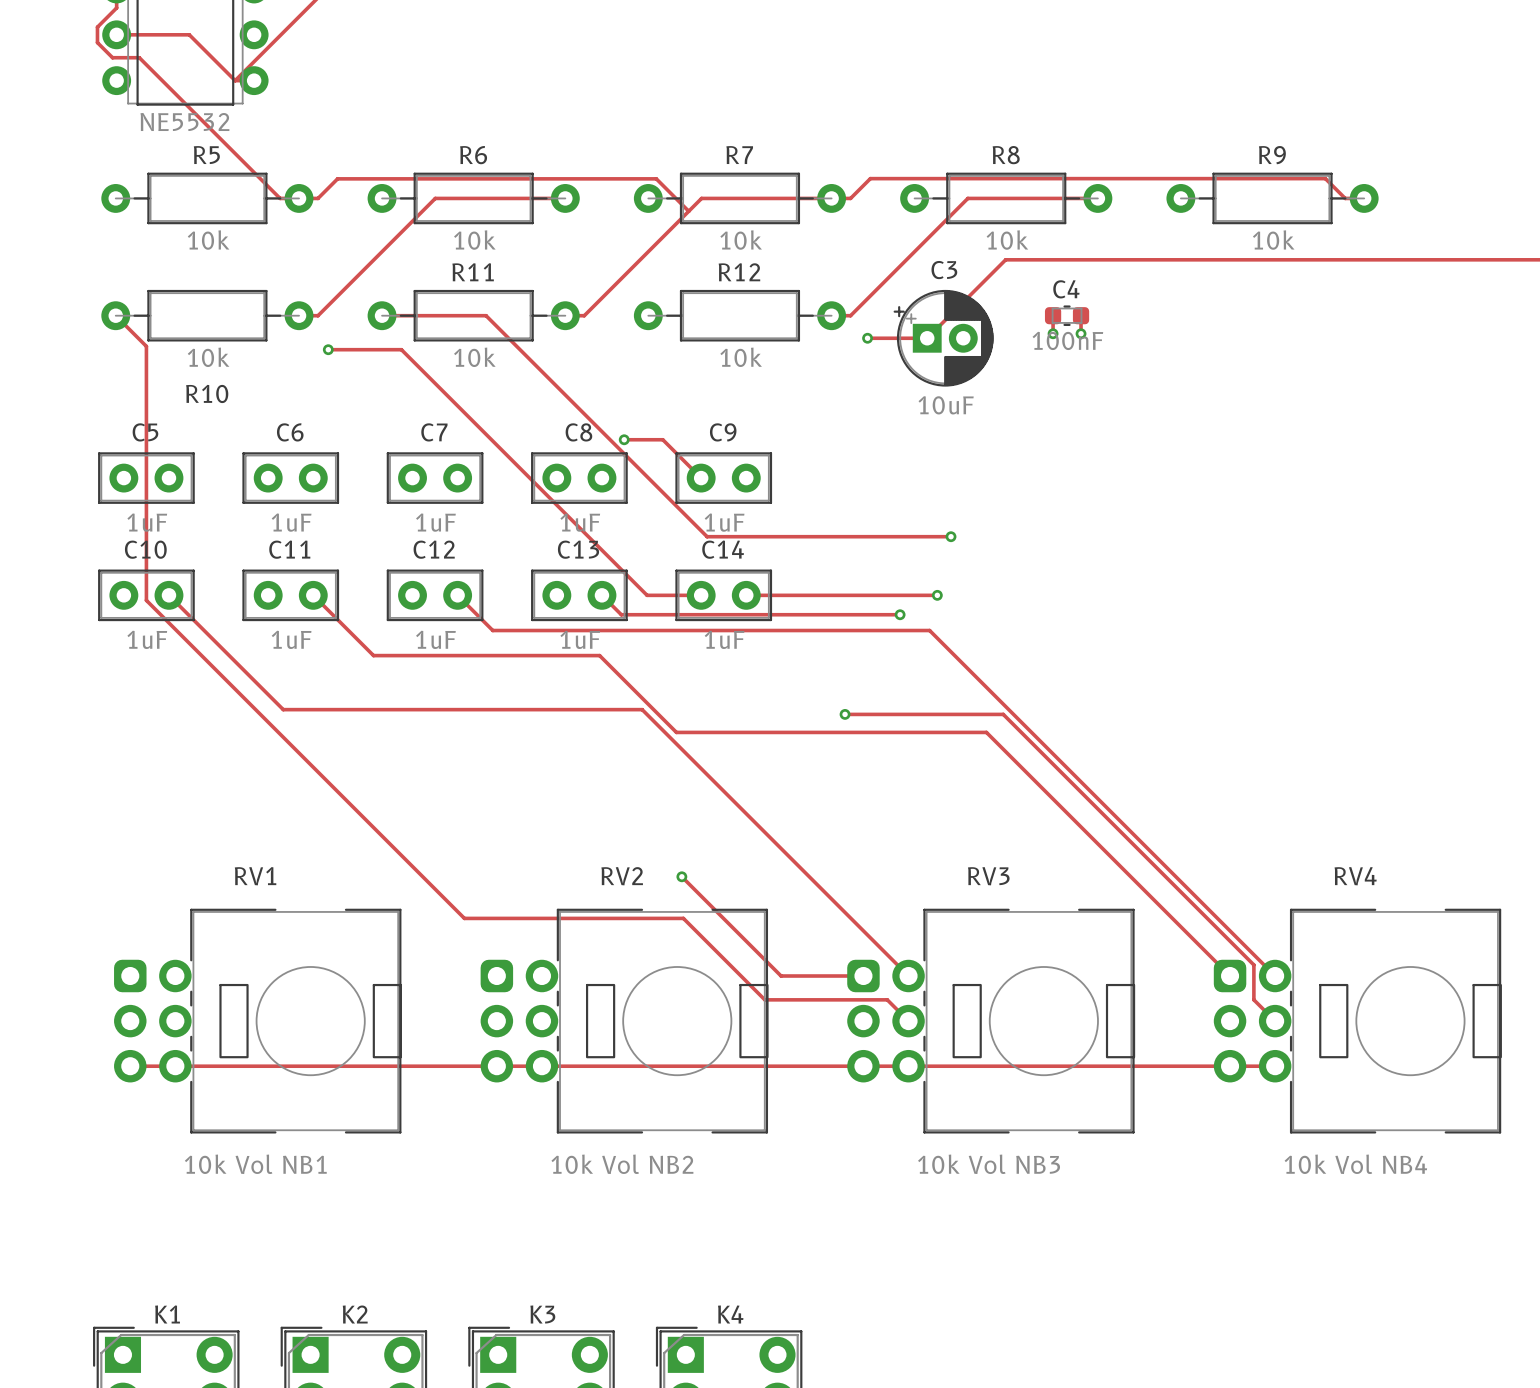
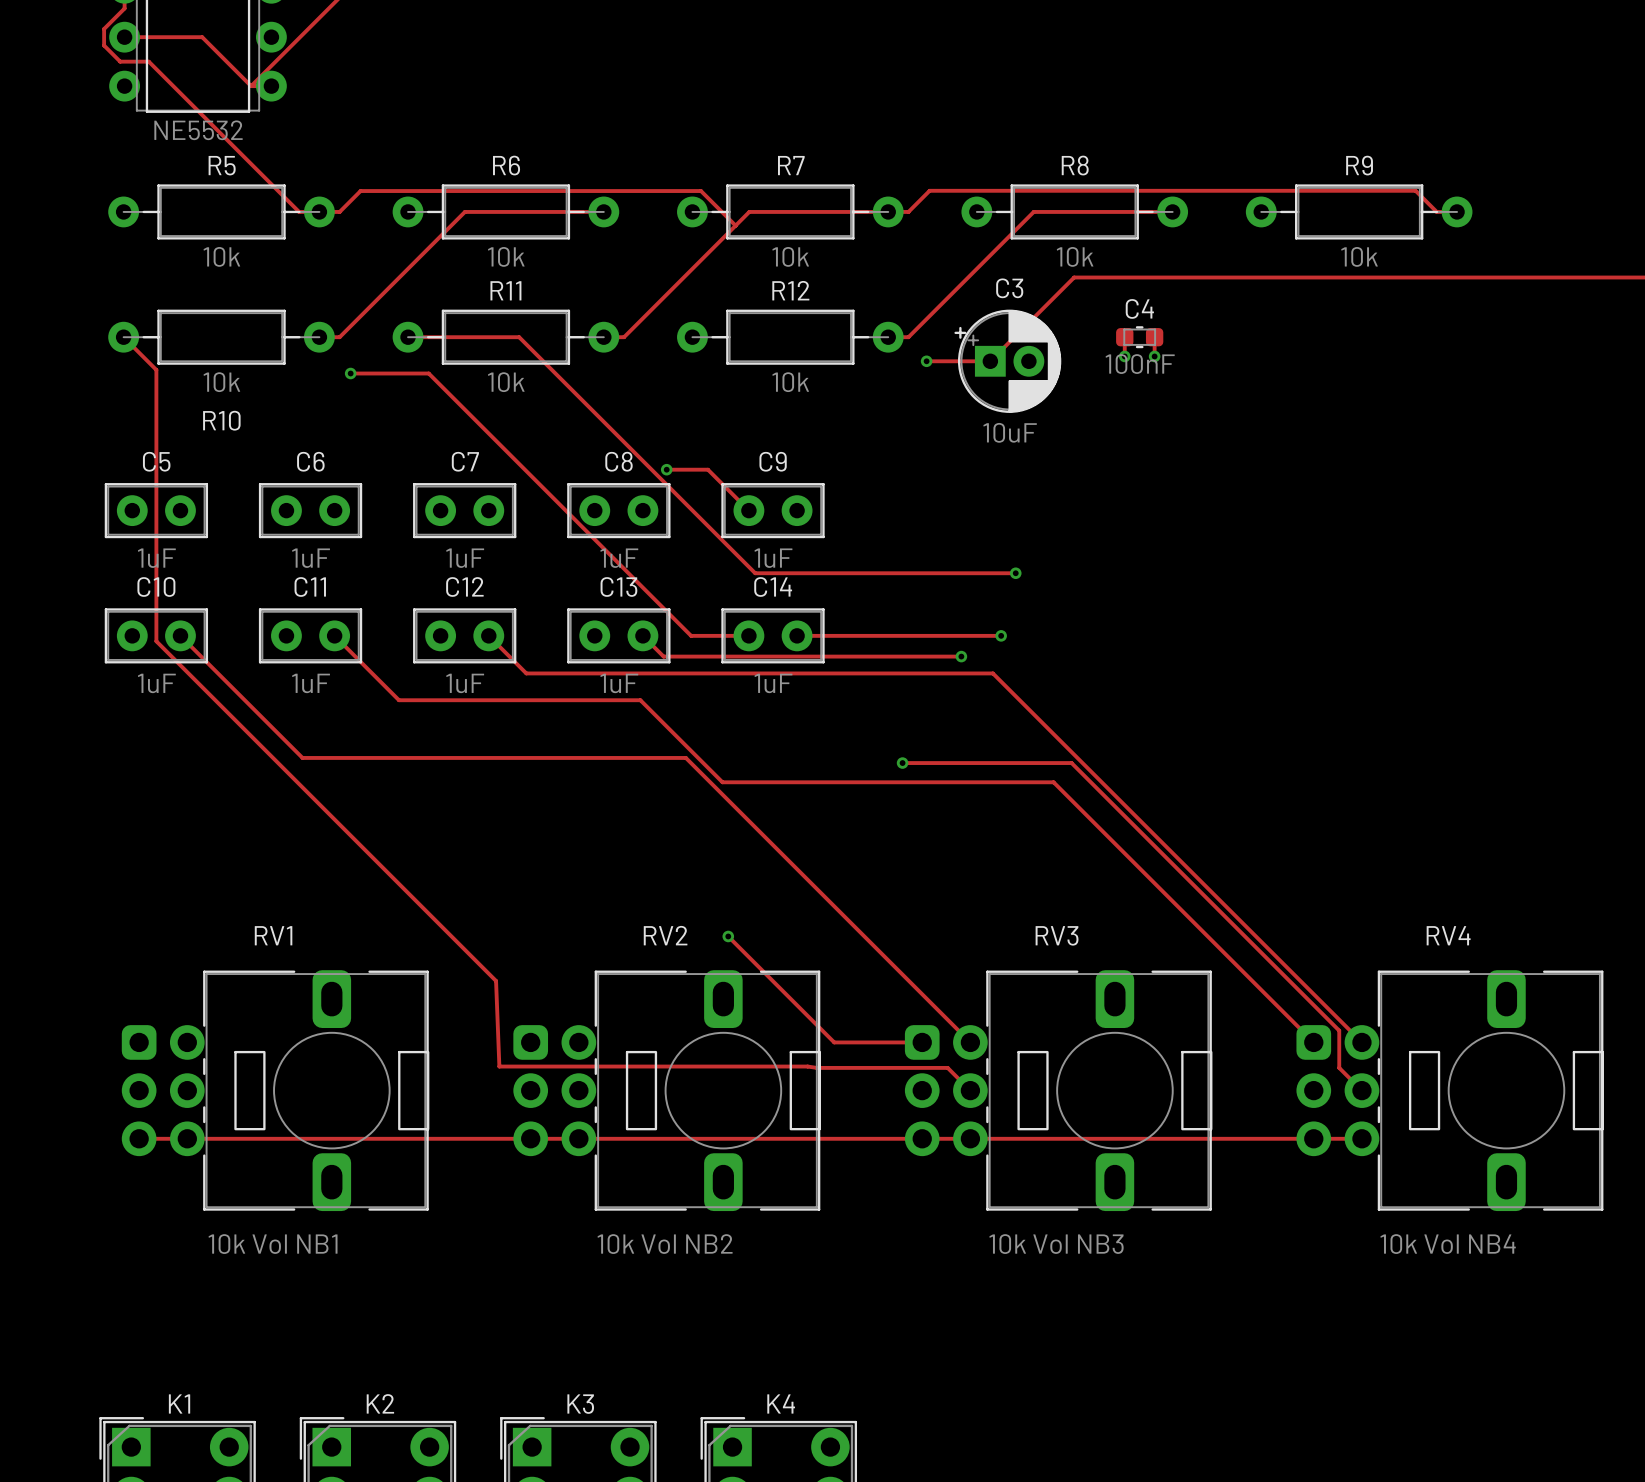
RV1 footprint: [114, 908, 402, 1134] -> [121, 970, 430, 1212]
RV2 footprint: [480, 908, 769, 1134] -> [513, 970, 821, 1212]
RV3 footprint: [847, 908, 1136, 1134] -> [904, 970, 1213, 1212]
RV4 footprint: [1213, 908, 1502, 1134] -> [1296, 970, 1604, 1212]
track: (464, 918) (683, 918) (764, 999) -> (496, 980) (499, 1066) (816, 1067)

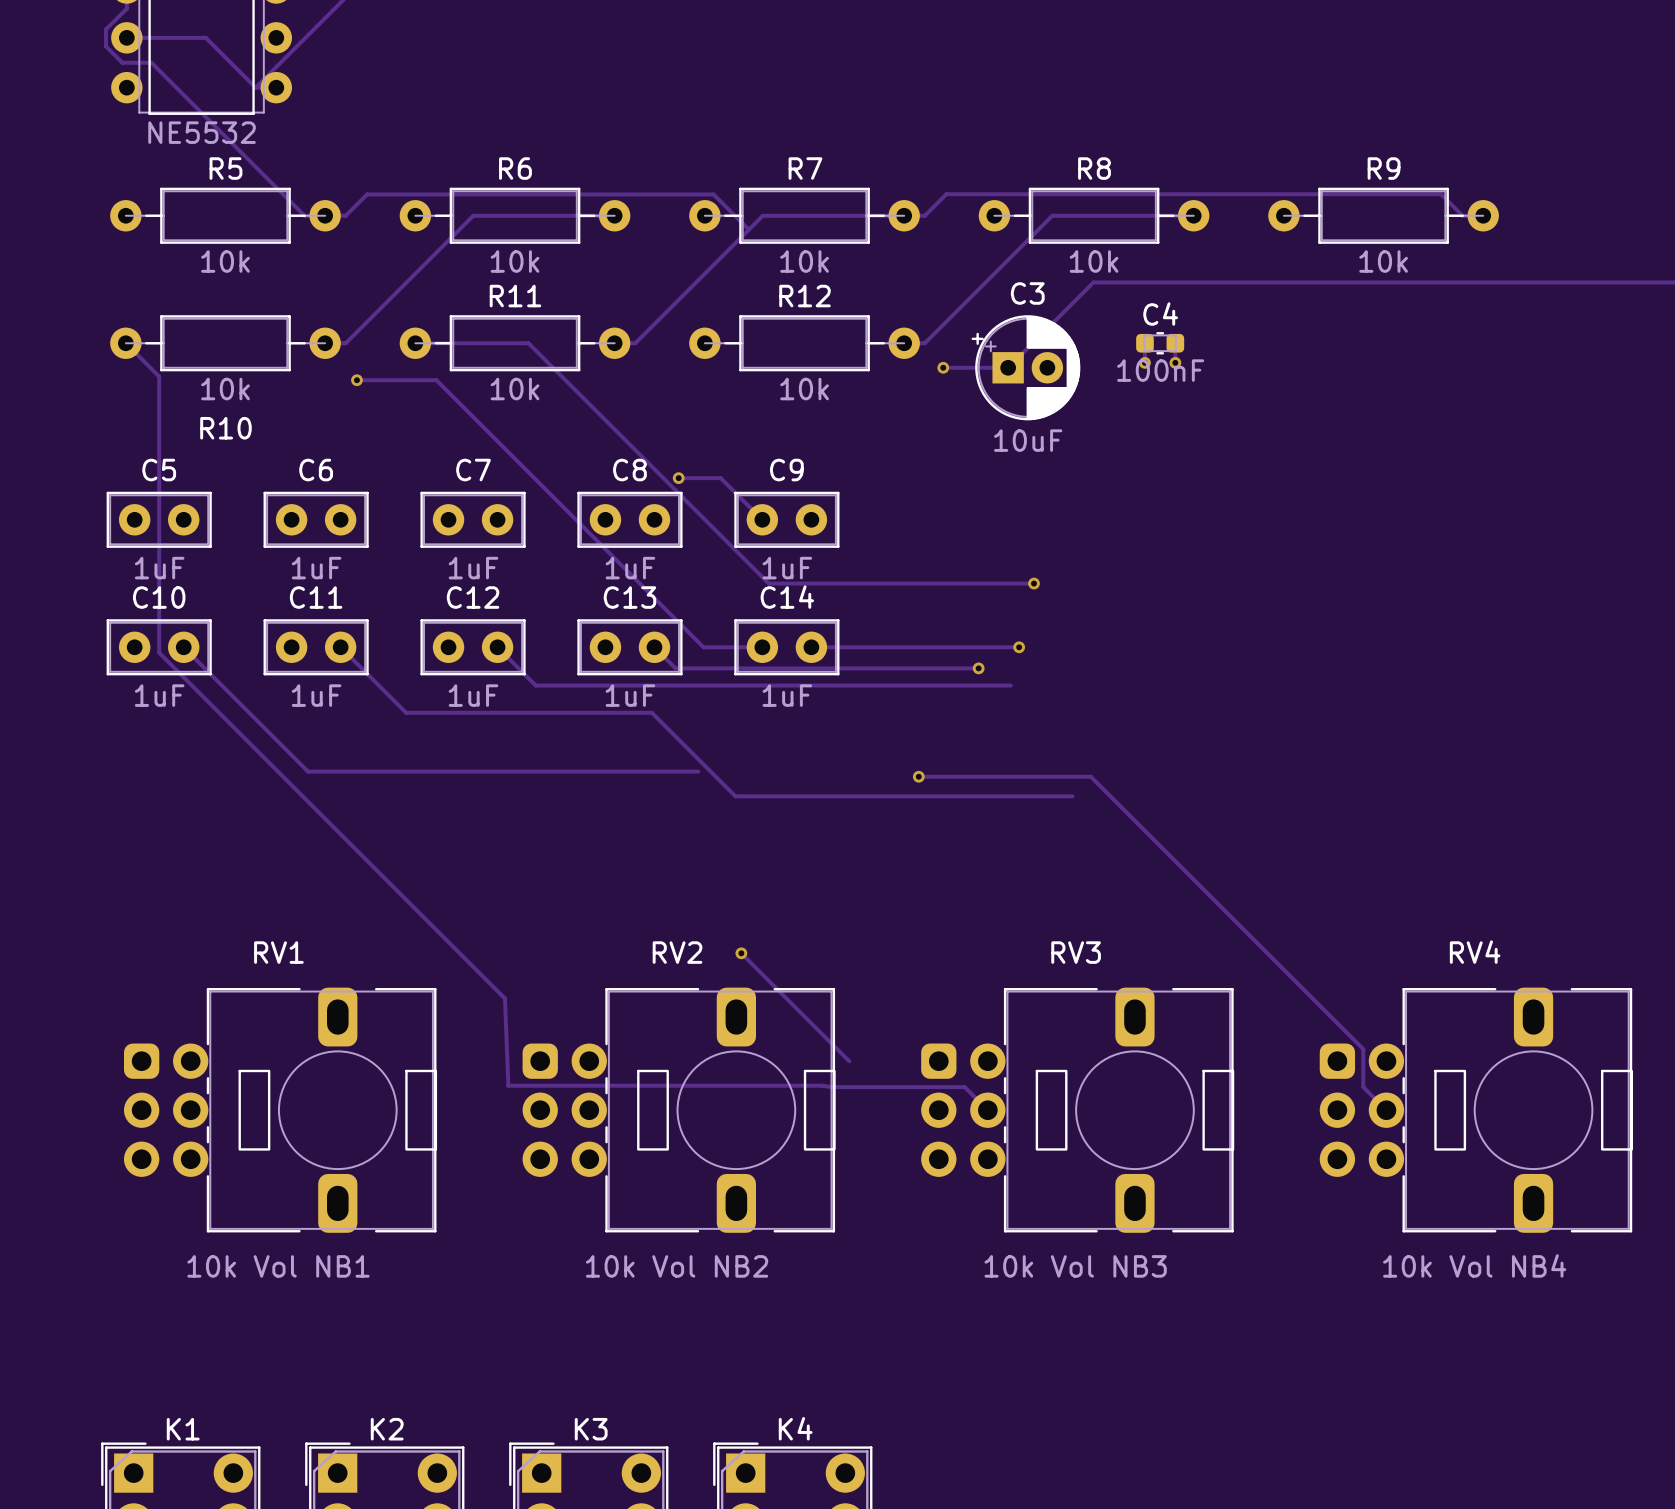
track: (992, 673) (1361, 1042) -> none
track: (685, 757) (970, 1042) -> none
track: (1053, 782) (1313, 1042) -> none
track: (834, 1042) (922, 1042) -> none
track: (139, 1138) (1361, 1138) -> none

